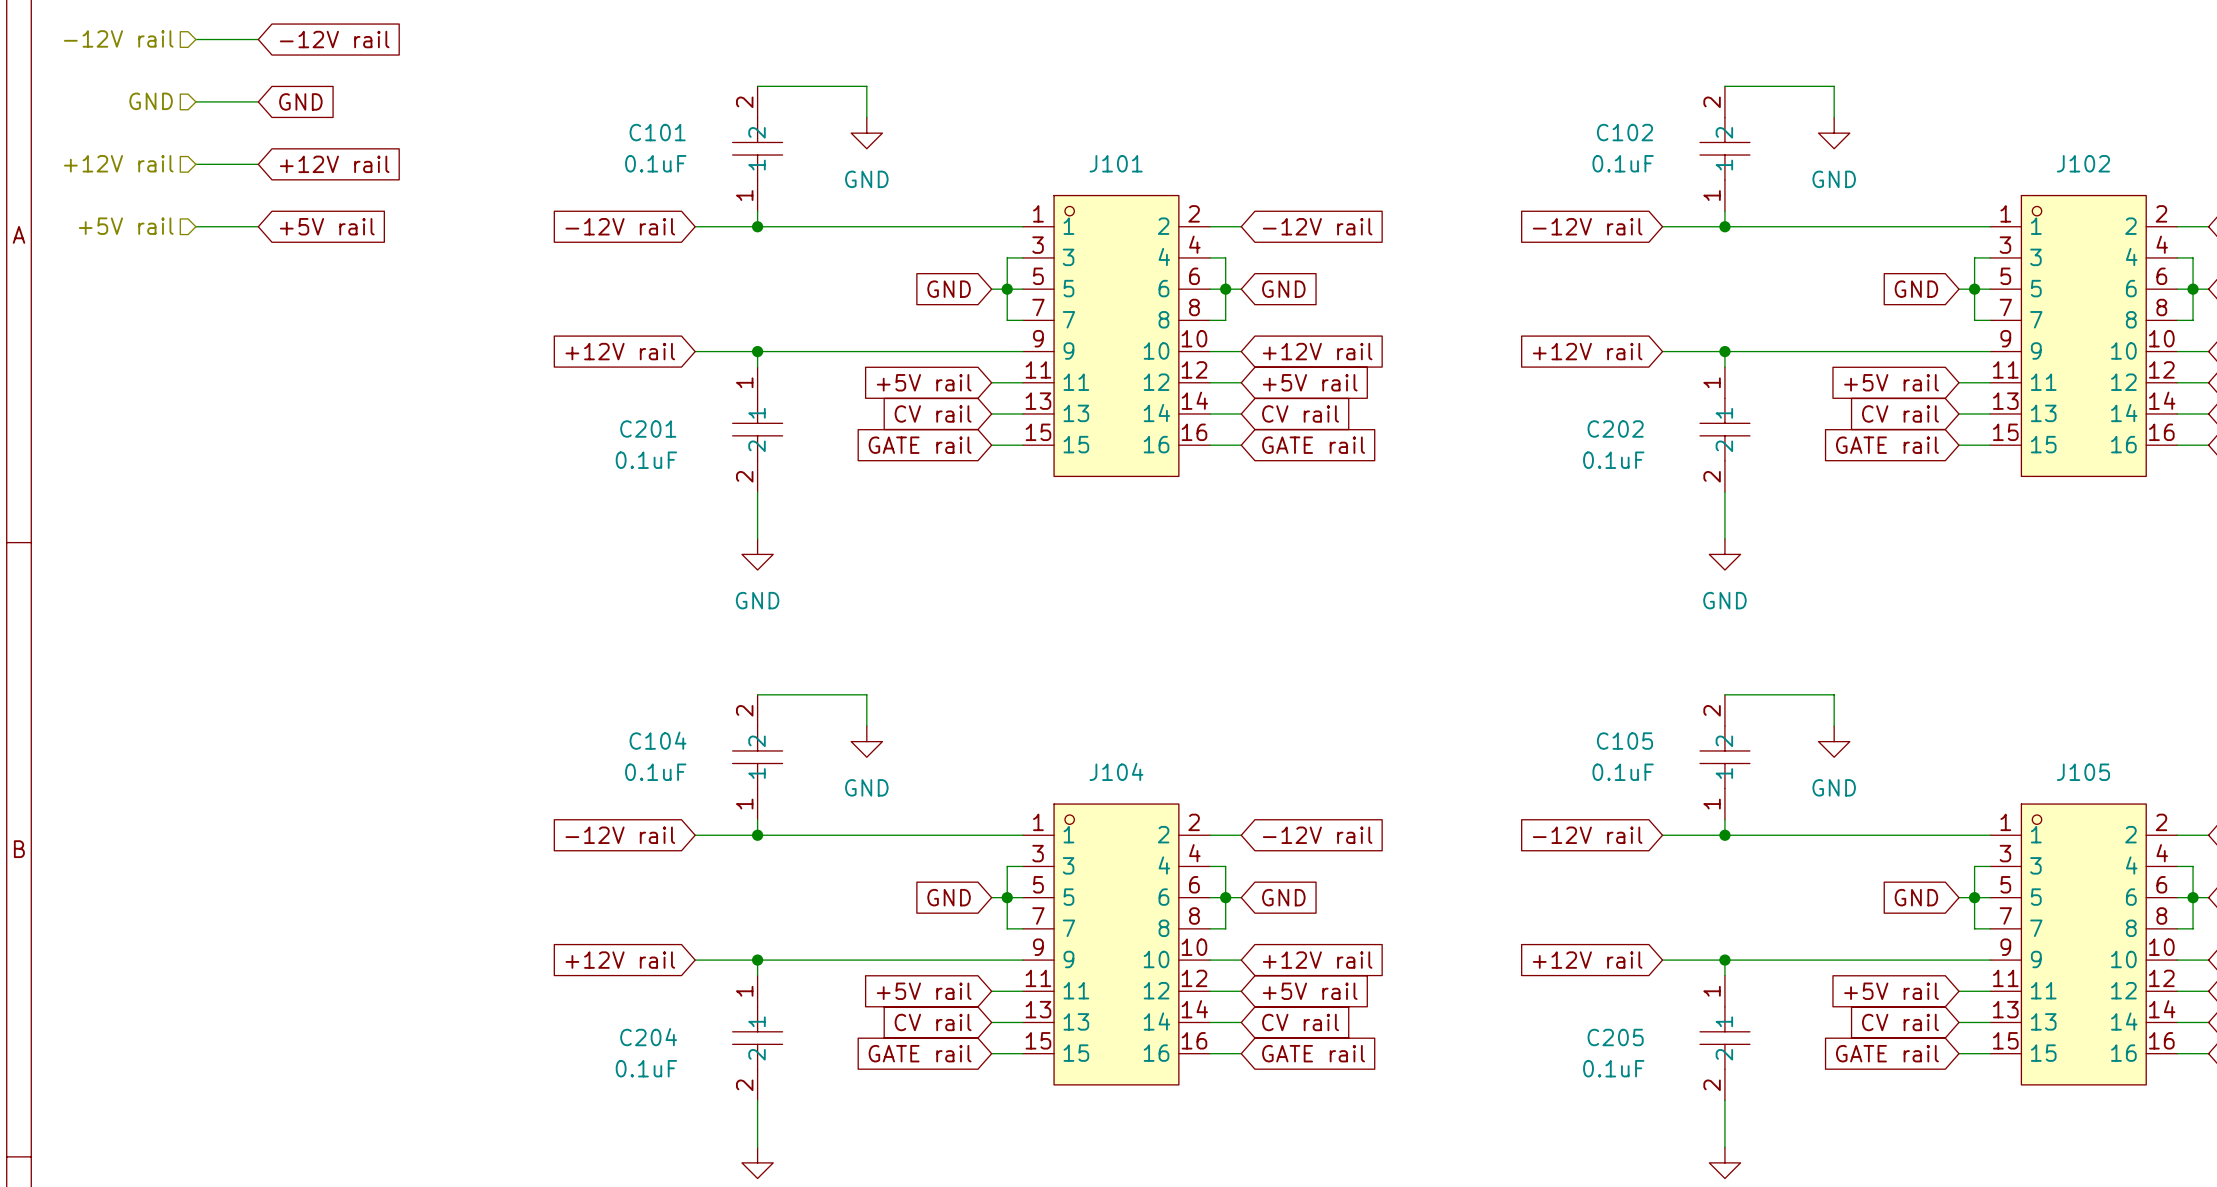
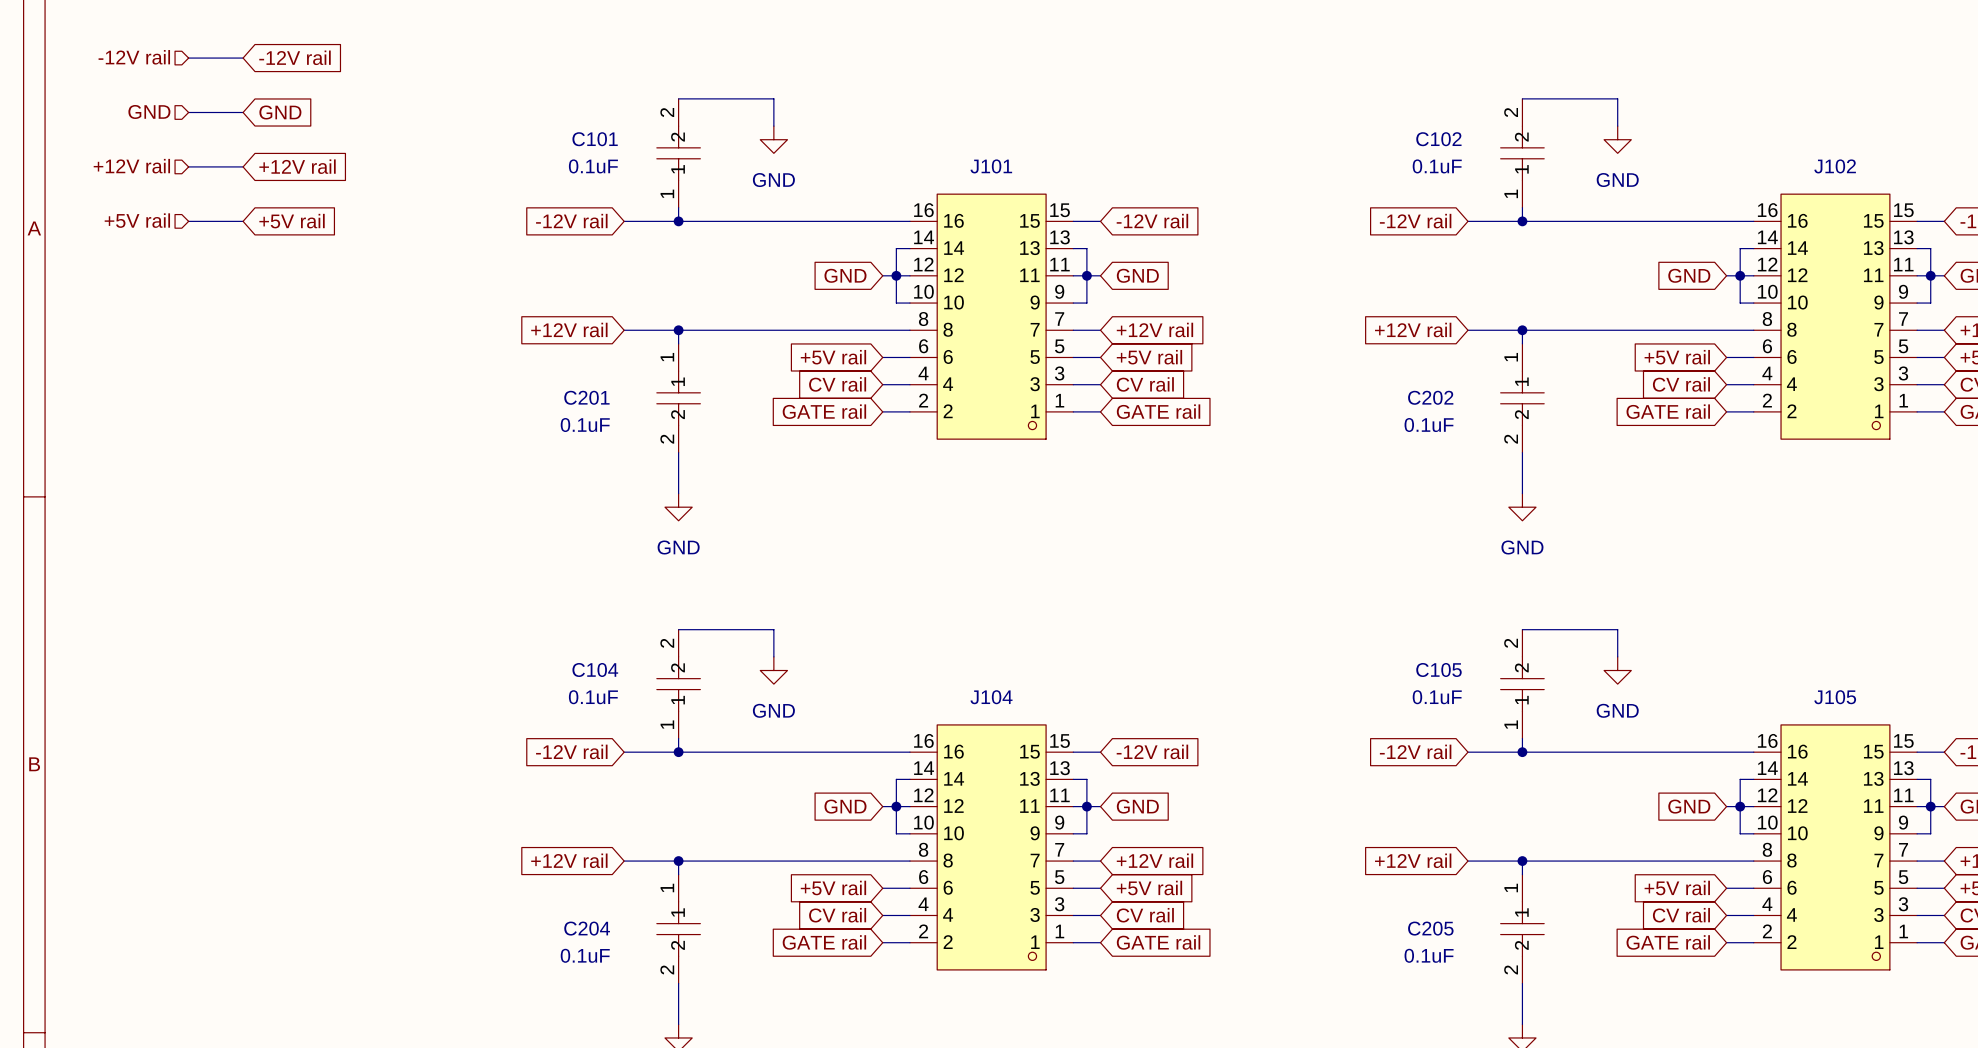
J101 rotation: 0° (1116, 335) -> 180° (991, 316)
J102 rotation: 0° (2083, 335) -> 180° (1835, 316)
J104 rotation: 0° (1116, 944) -> 180° (991, 847)
J105 rotation: 0° (2083, 944) -> 180° (1835, 847)

